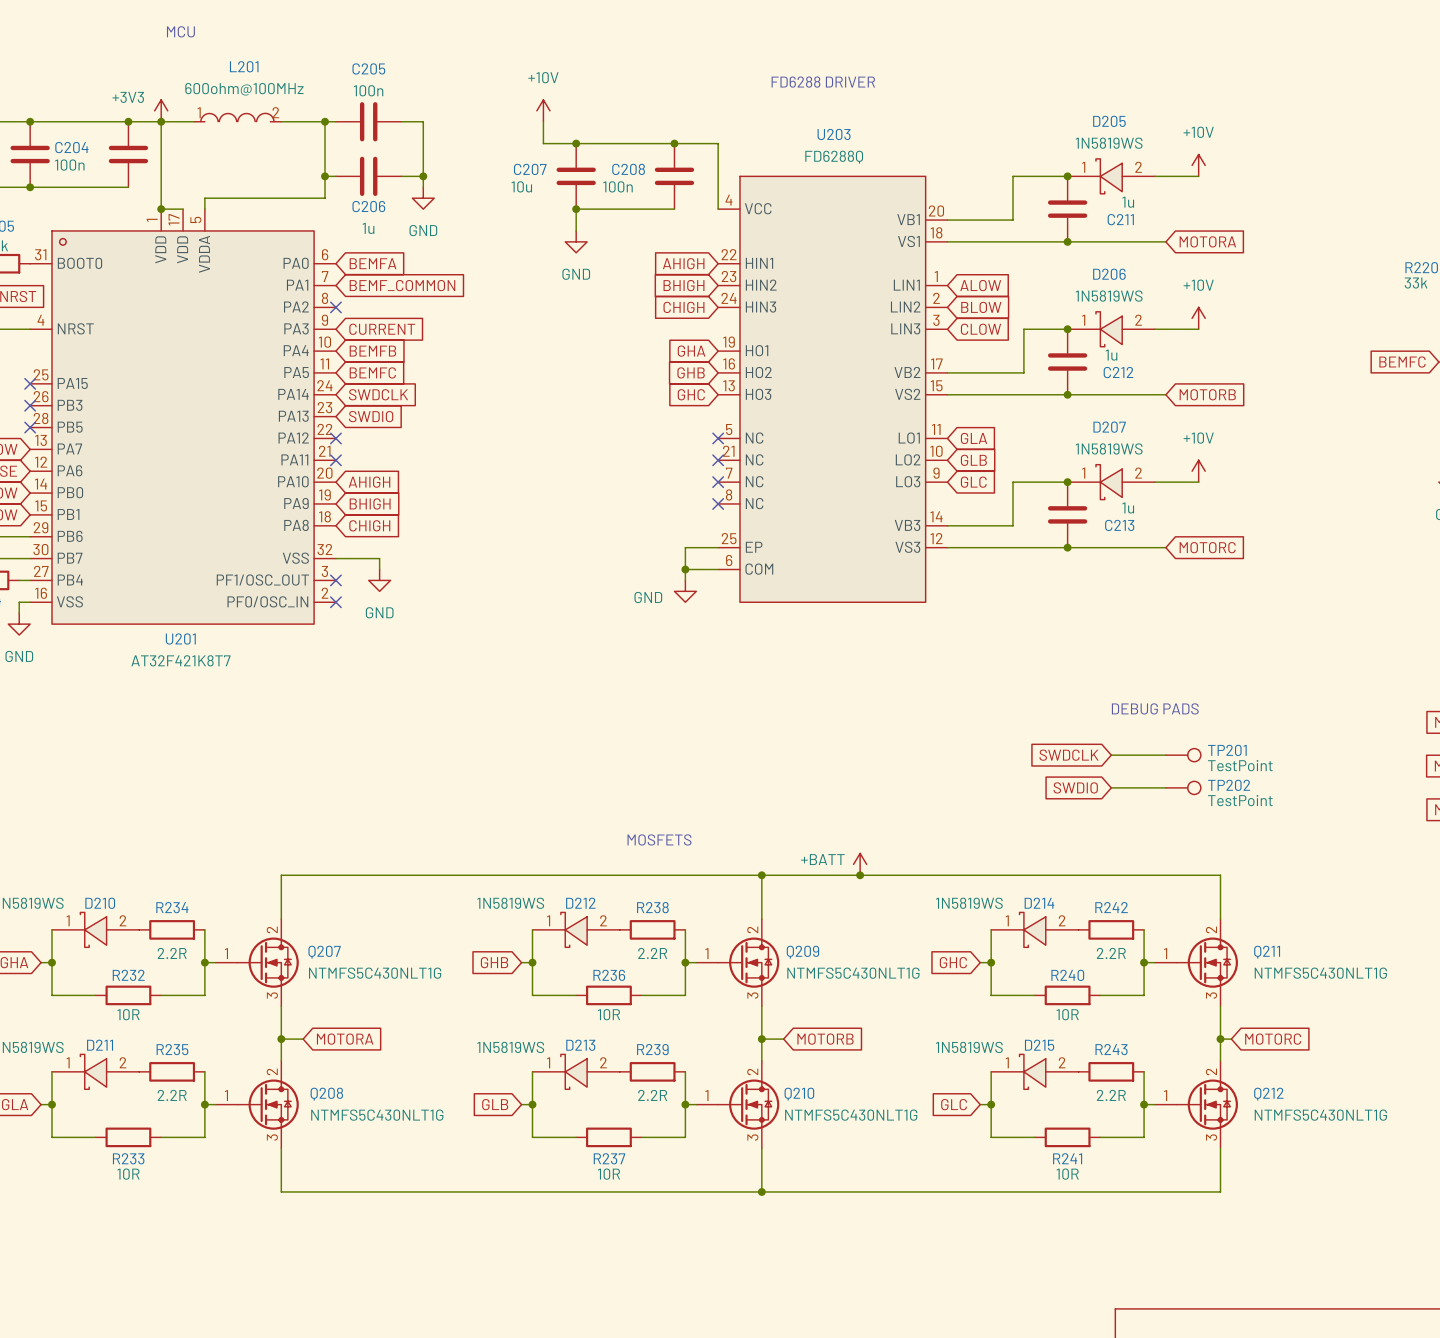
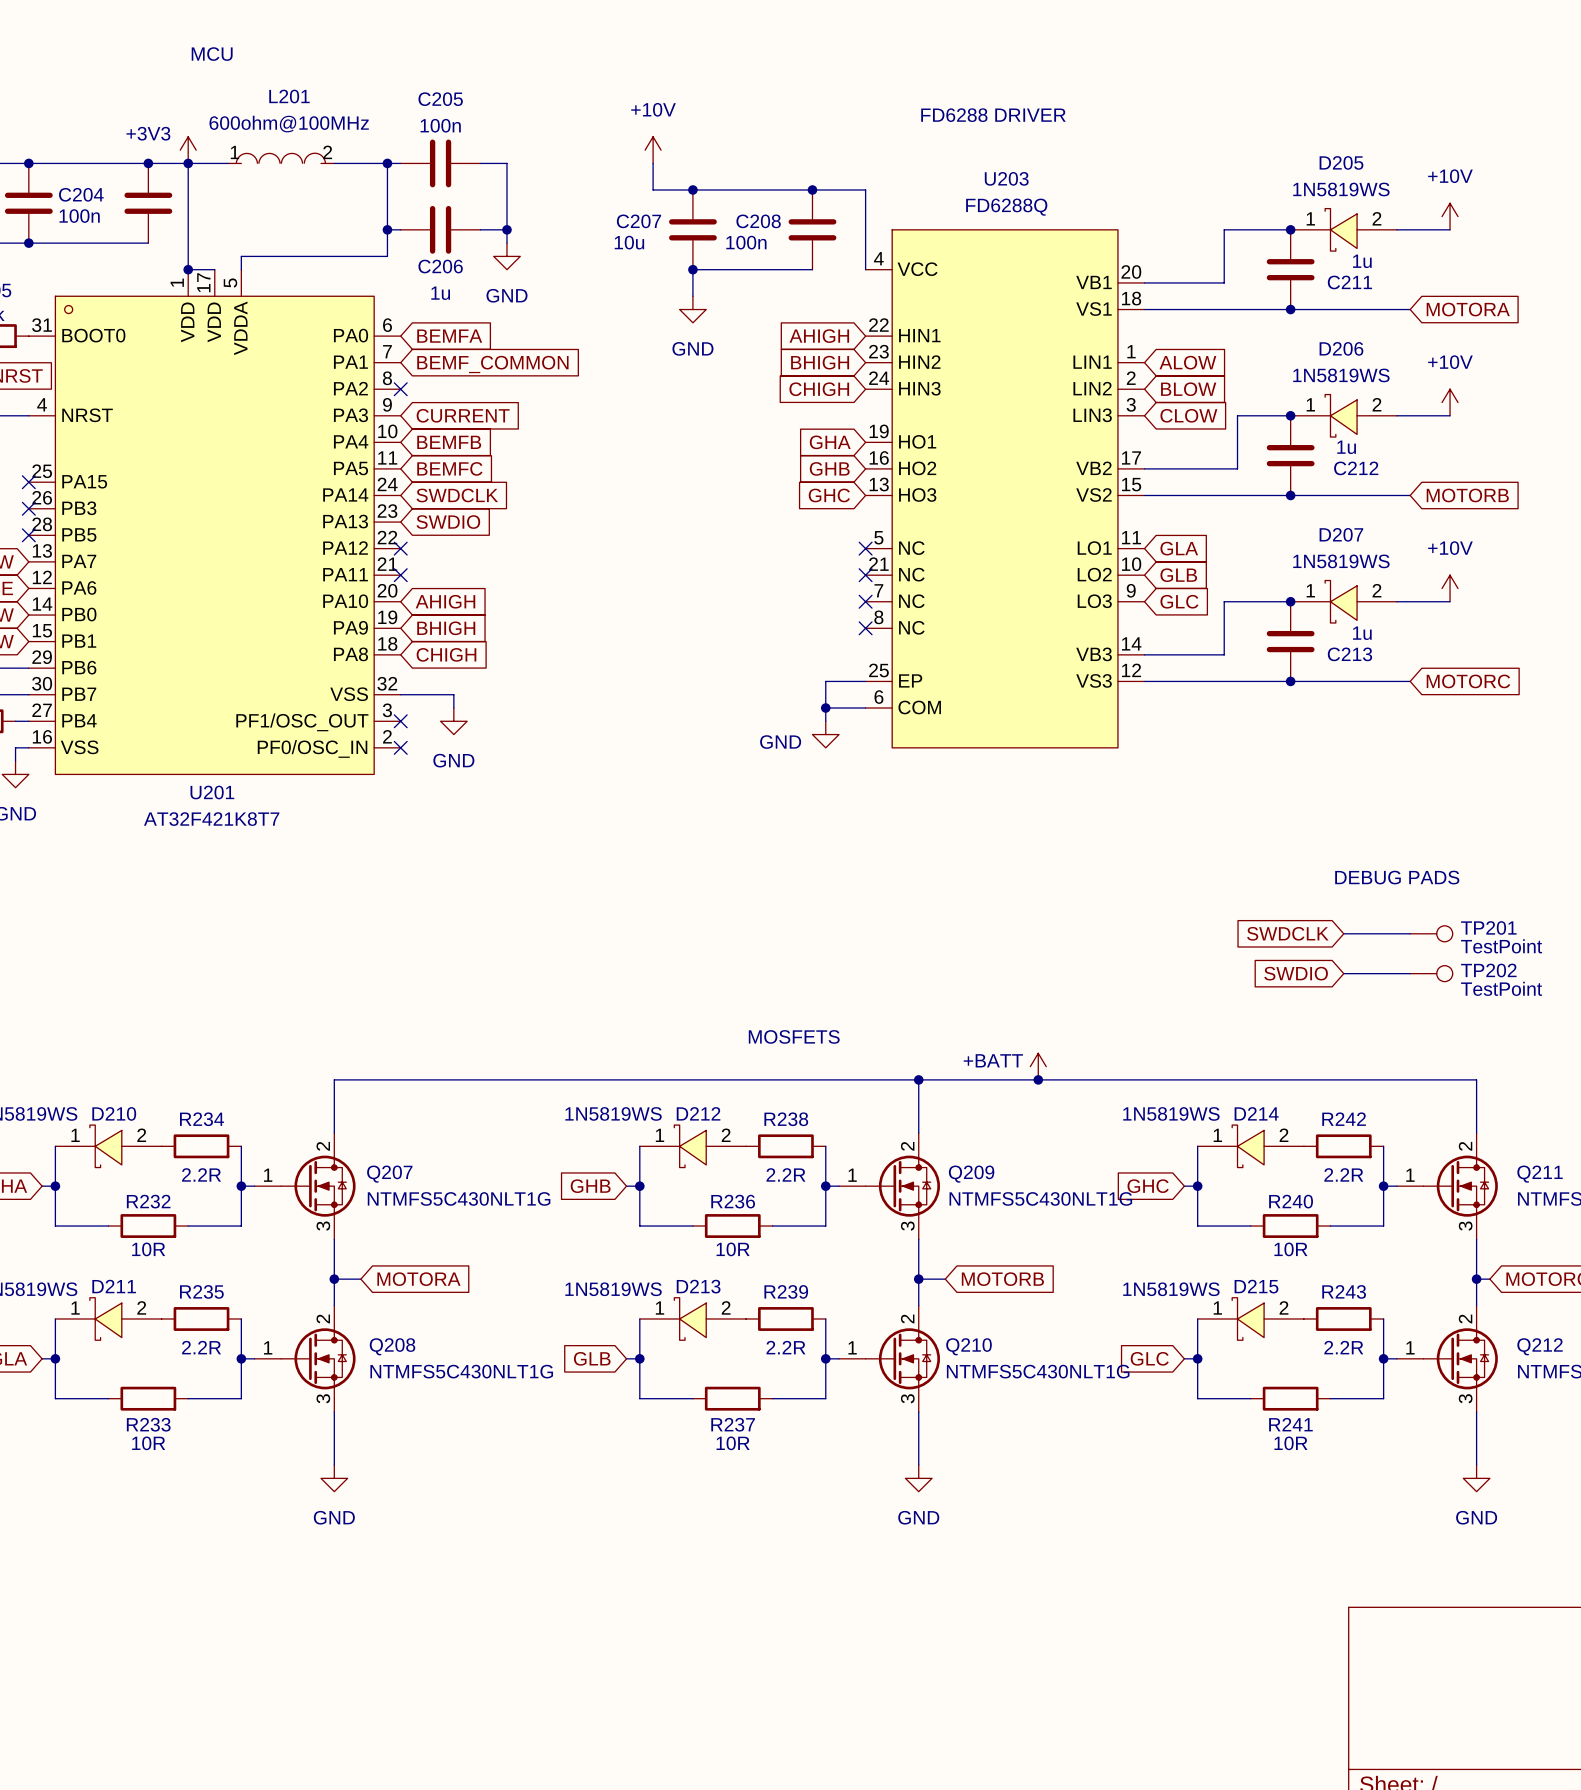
wire: (281, 1191) (1220, 1191) -> none
junction: (761, 1191) -> none
power symbol: none -> GND (334, 1478)
power symbol: none -> GND (918, 1478)
power symbol: none -> GND (1476, 1478)

